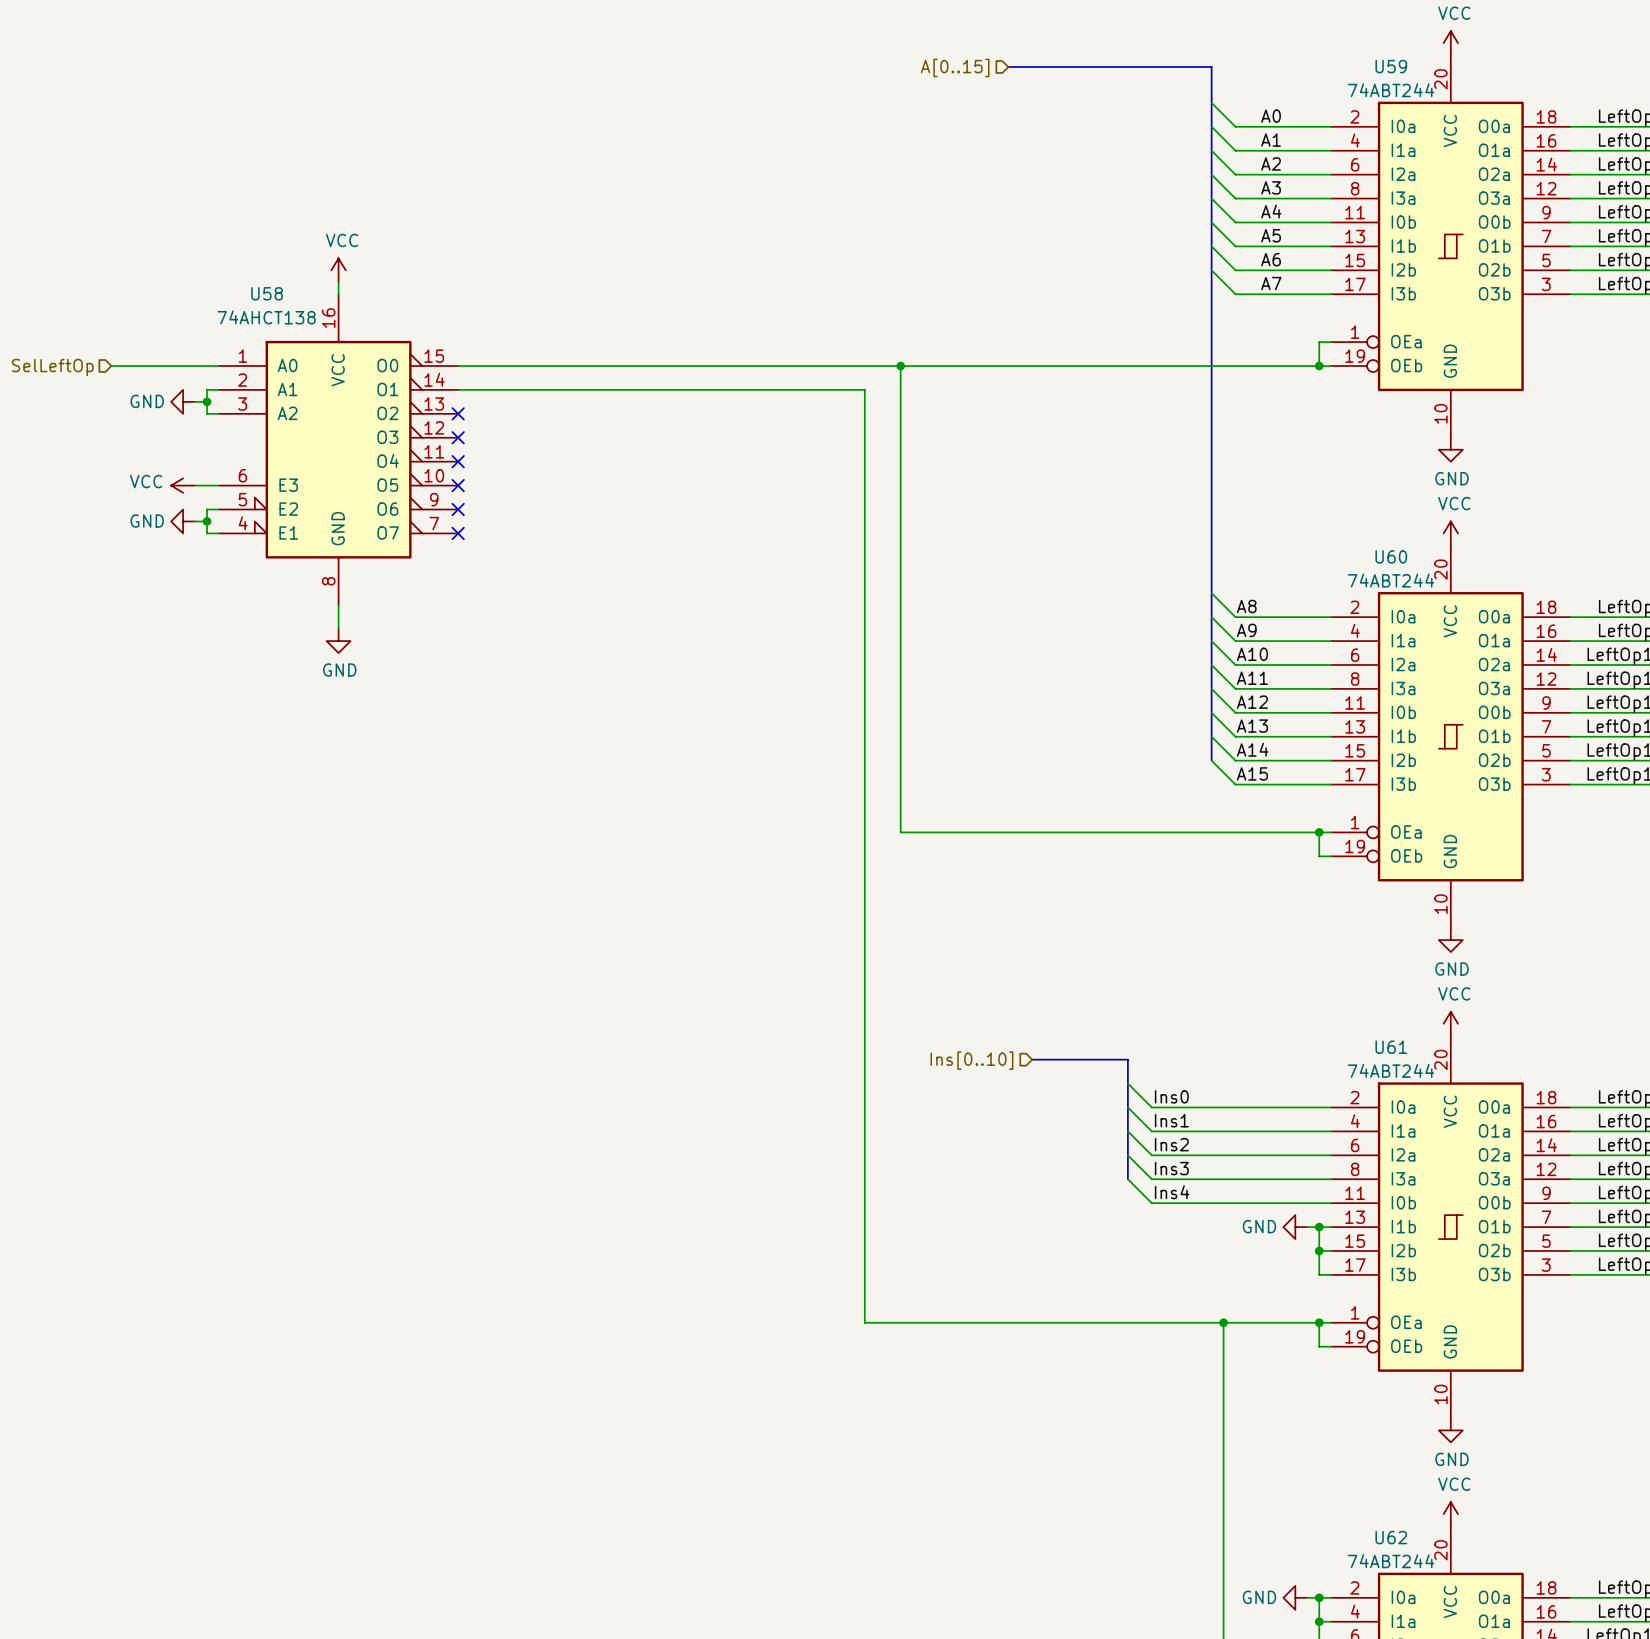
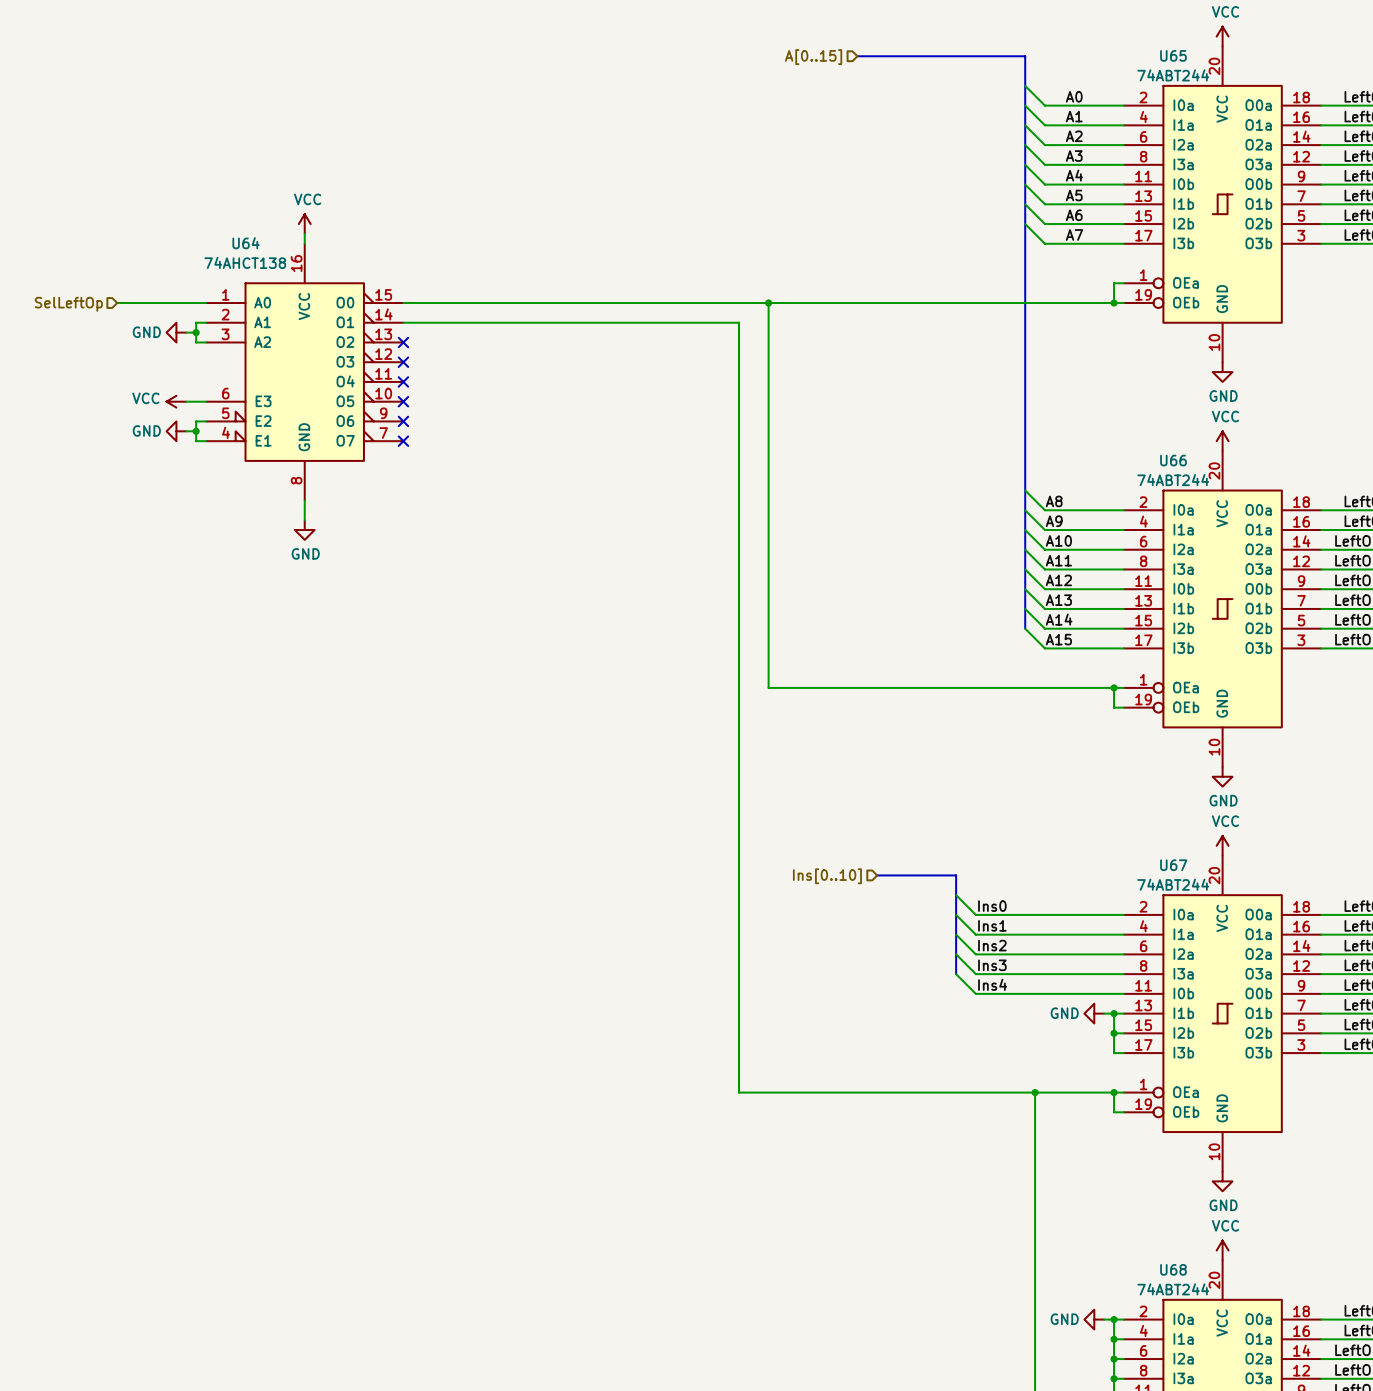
U59 name: U59 (1391, 66) -> U65 (1173, 55)
U58 name: U58 (267, 293) -> U64 (245, 243)
U60 name: U60 (1391, 556) -> U66 (1173, 460)
U61 name: U61 (1391, 1047) -> U67 (1173, 865)
U62 name: U62 (1391, 1537) -> U68 (1173, 1269)

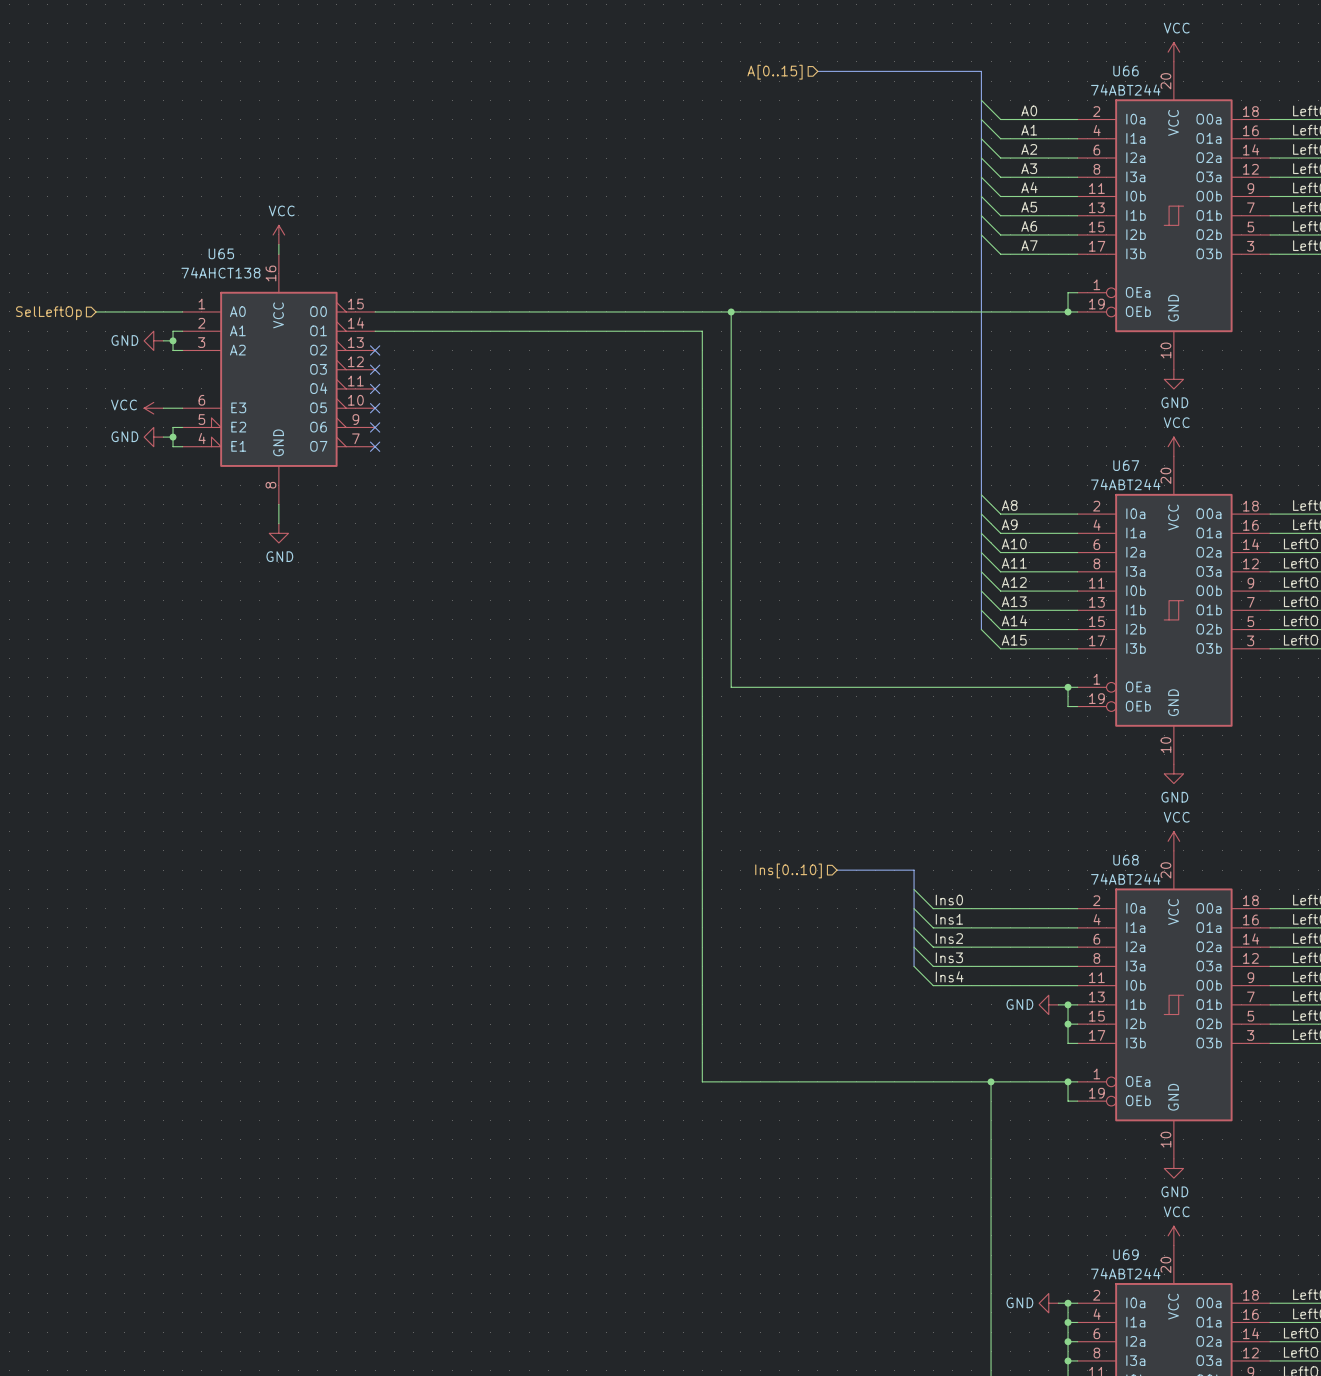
U65 name: U65 (1173, 55) -> U66 (1125, 71)
U64 name: U64 (245, 243) -> U65 (221, 253)
U66 name: U66 (1173, 460) -> U67 (1126, 465)
U67 name: U67 (1173, 865) -> U68 (1125, 860)
U68 name: U68 (1173, 1269) -> U69 (1125, 1254)

